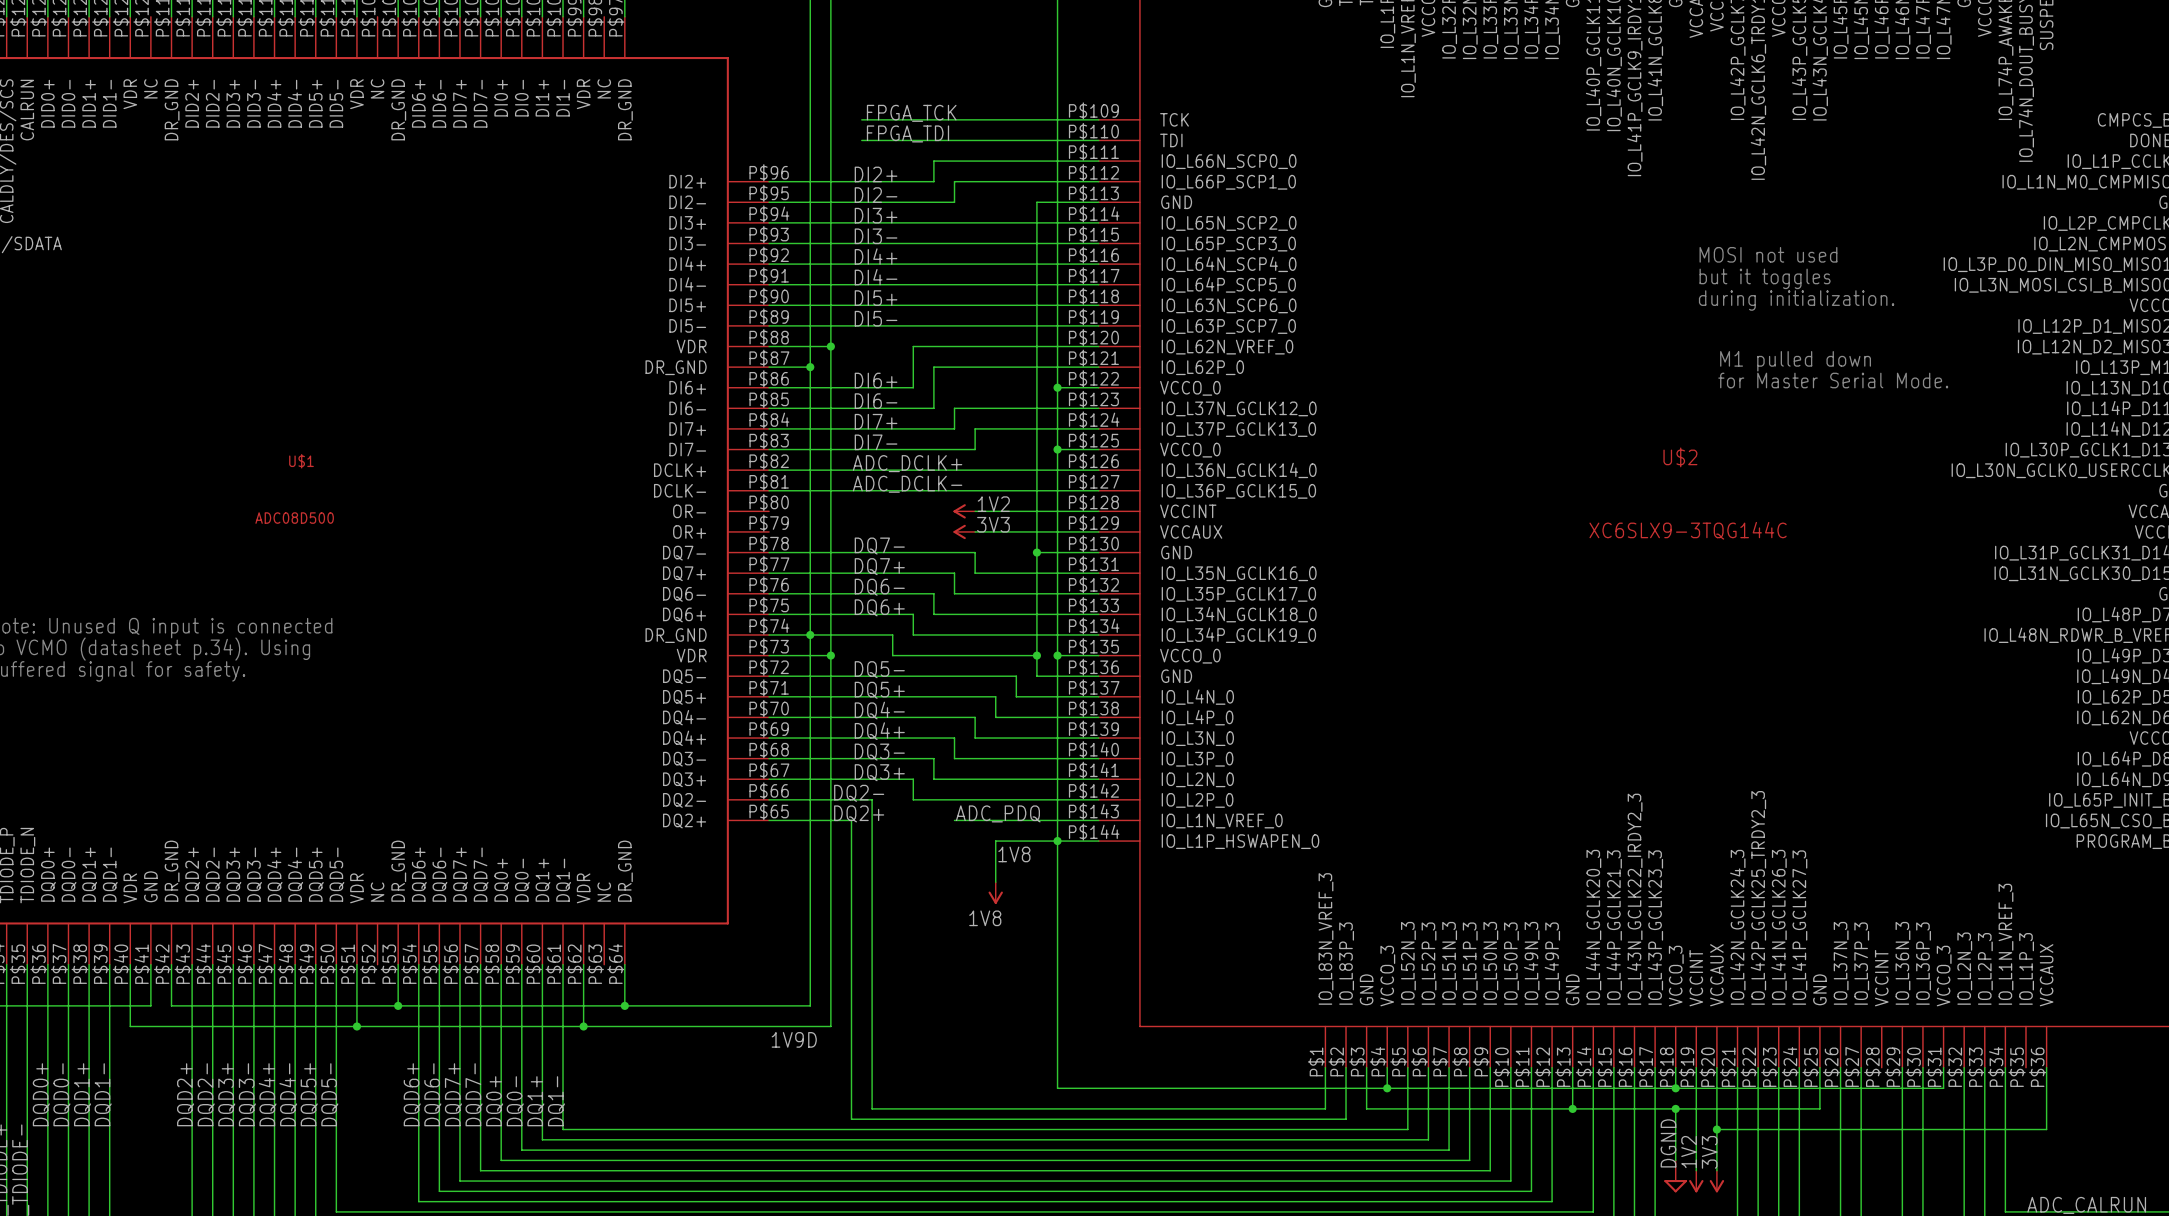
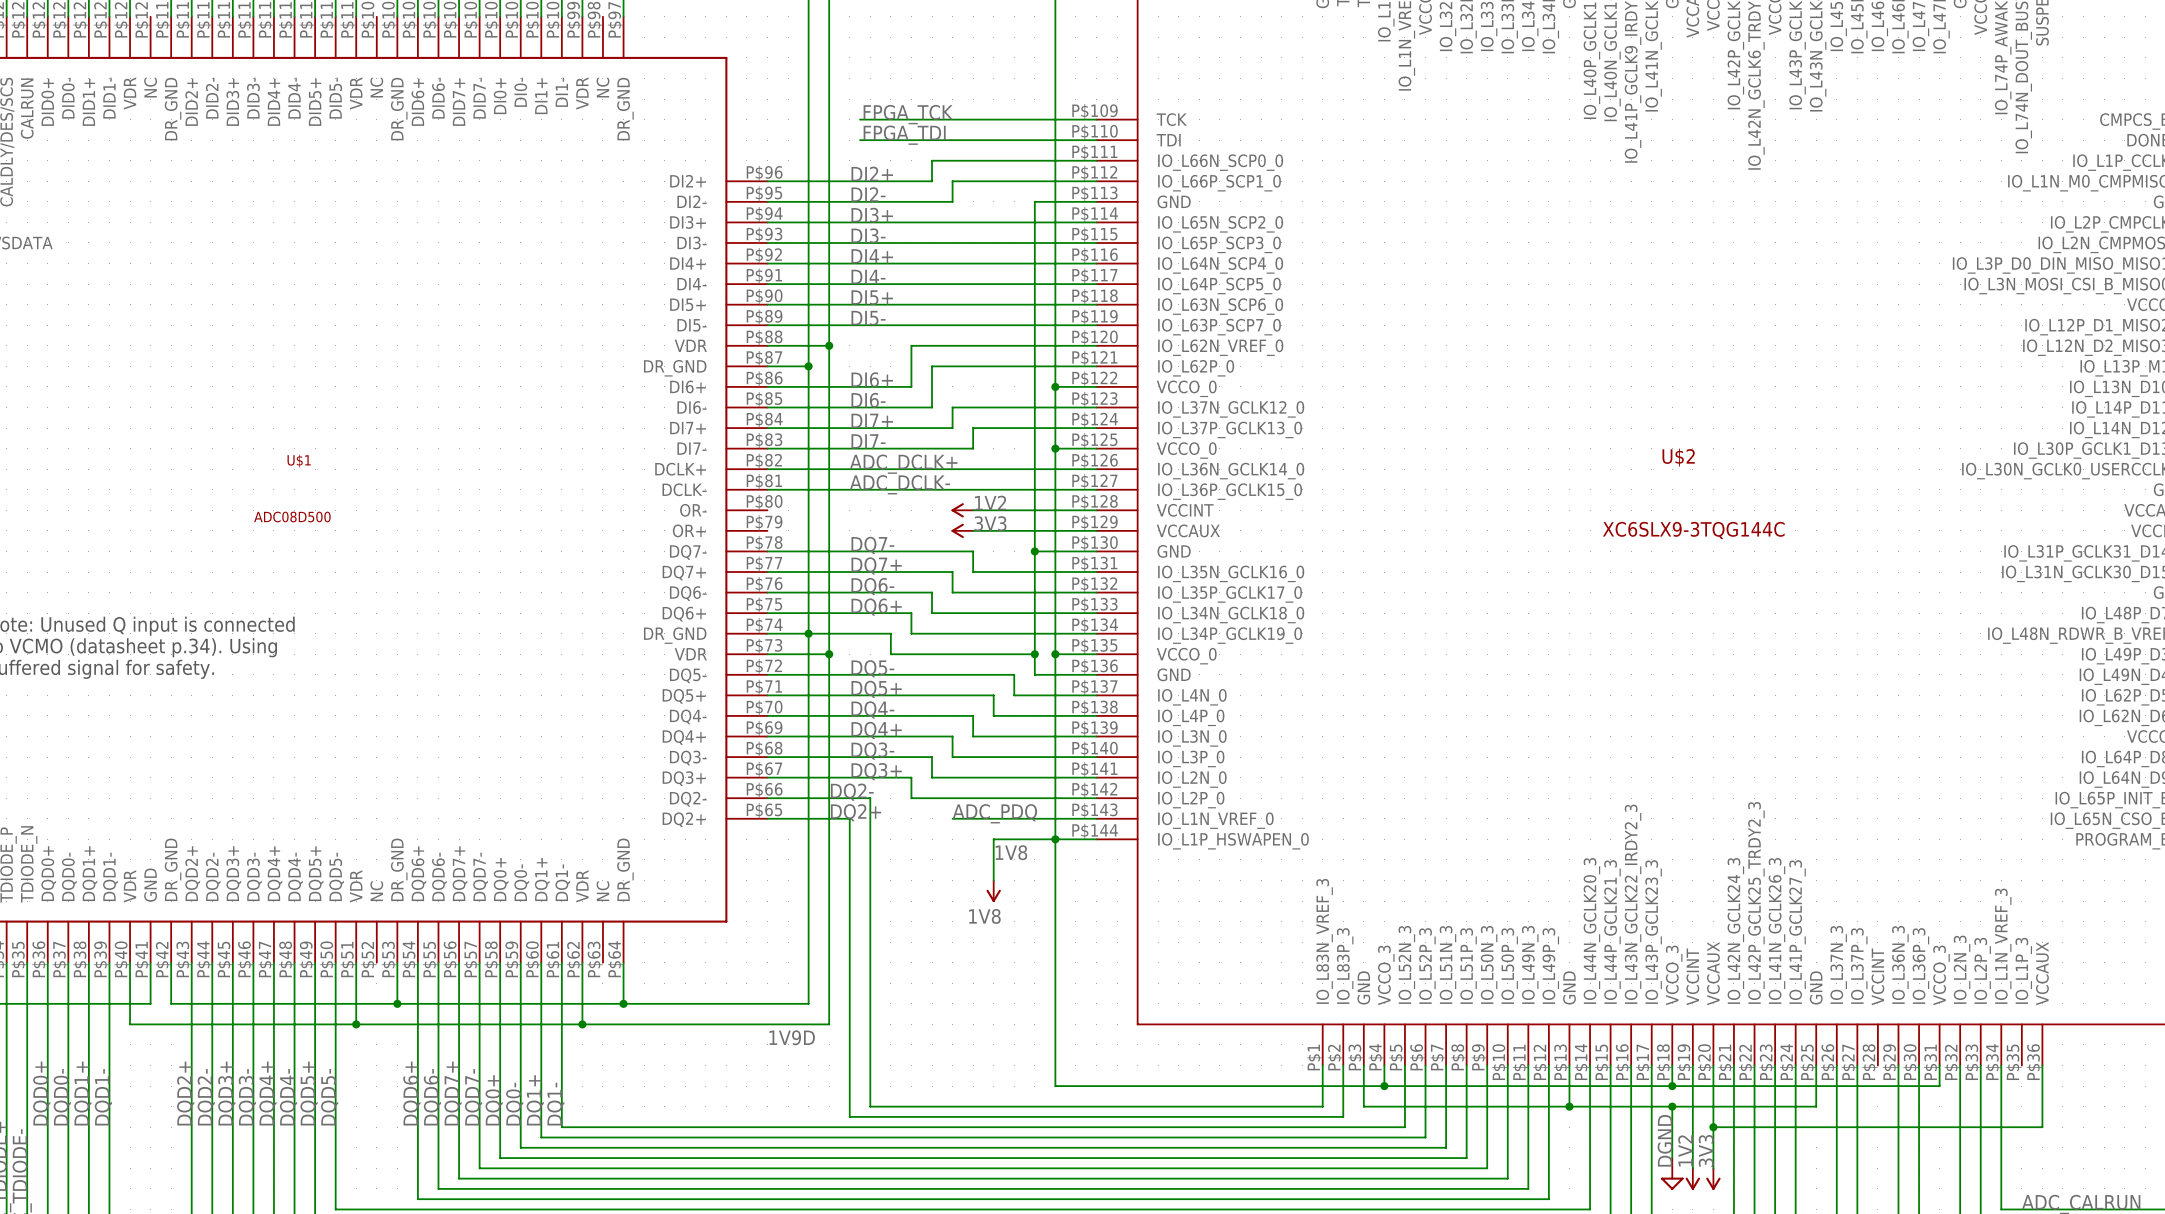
text: MOSI not used (1768, 254) -> none
text: but it toggles (1765, 278) -> none
text: during initialization. (1796, 300) -> none
text: M1 pulled down (1795, 361) -> none
text: for Master Serial Mode. (1833, 380) -> none

